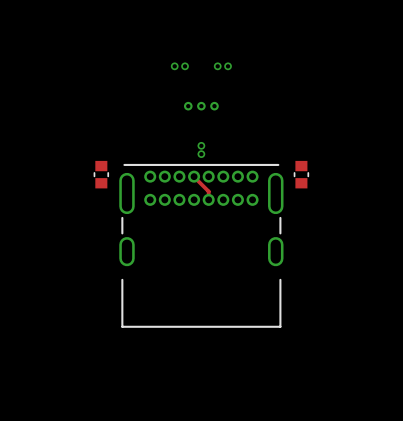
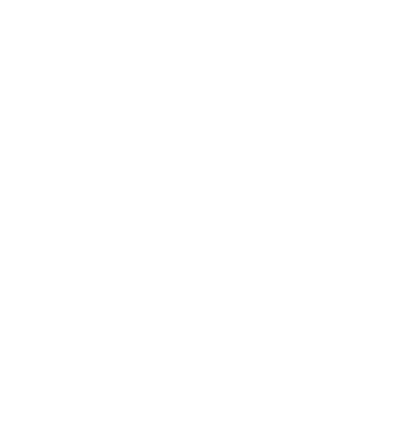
via: (174, 66) -> none
via: (185, 66) -> none
via: (217, 66) -> none
via: (228, 66) -> none
via: (188, 106) -> none
via: (201, 106) -> none
via: (214, 106) -> none
via: (201, 145) -> none
via: (201, 154) -> none
part: (101, 174) -> none
part: (301, 174) -> none
track: (194, 176) (208, 191) (208, 199) -> none
part: (201, 245) -> none

